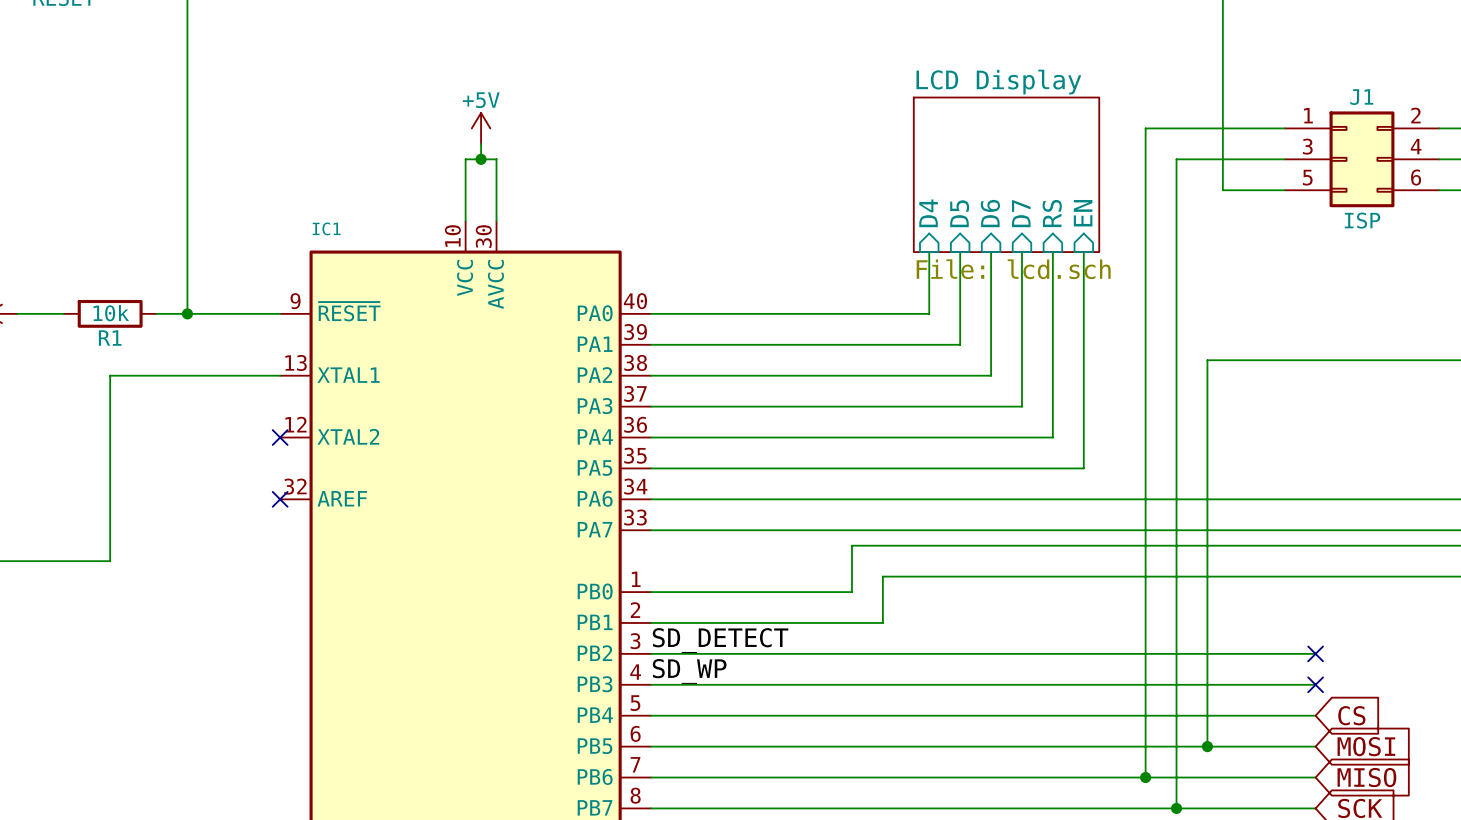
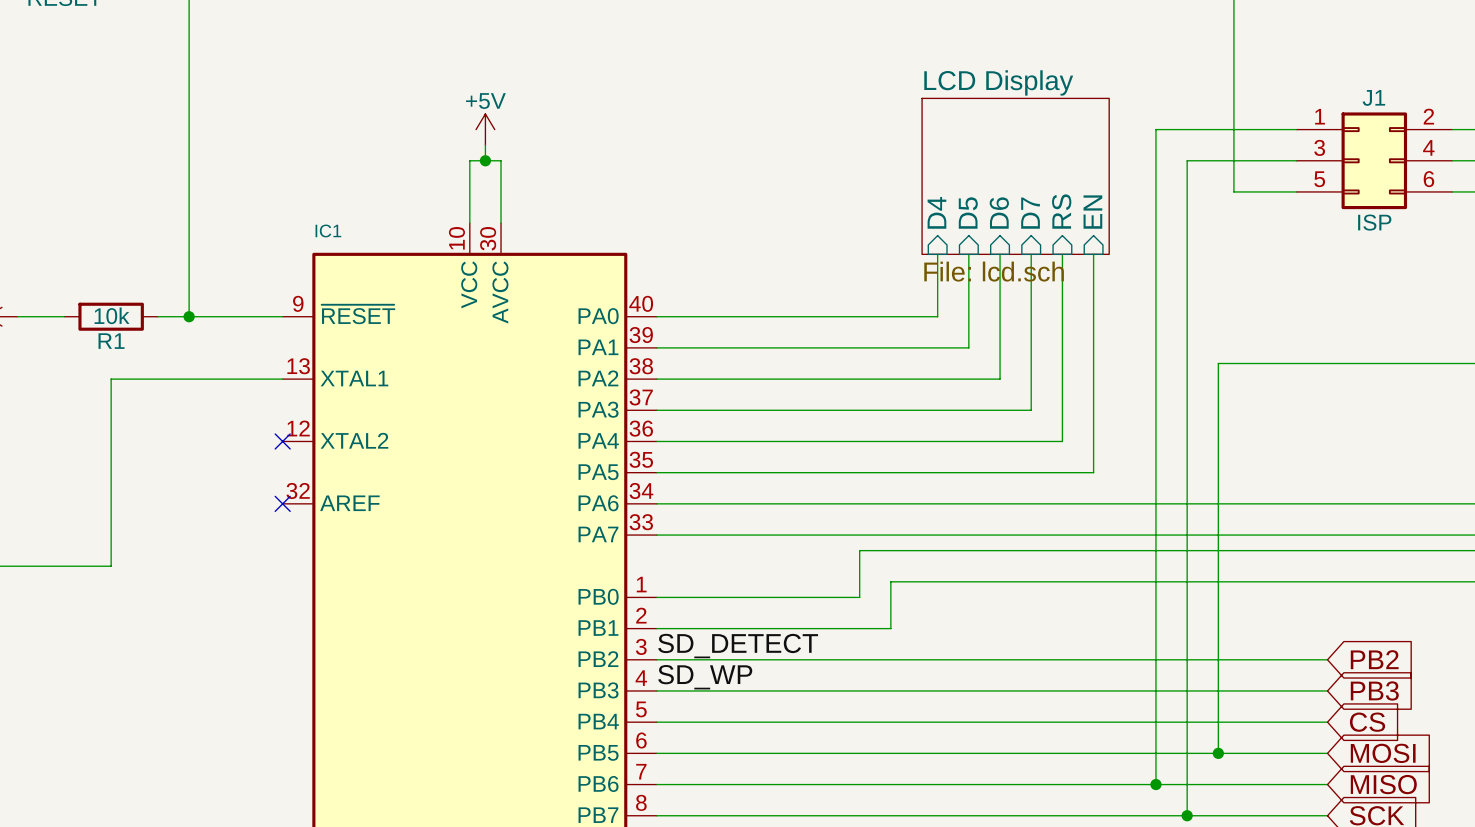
no-connect mark: (1315, 653) -> none
global label: none -> PB2 (1374, 659)
no-connect mark: (1315, 684) -> none
global label: none -> PB3 (1374, 690)

